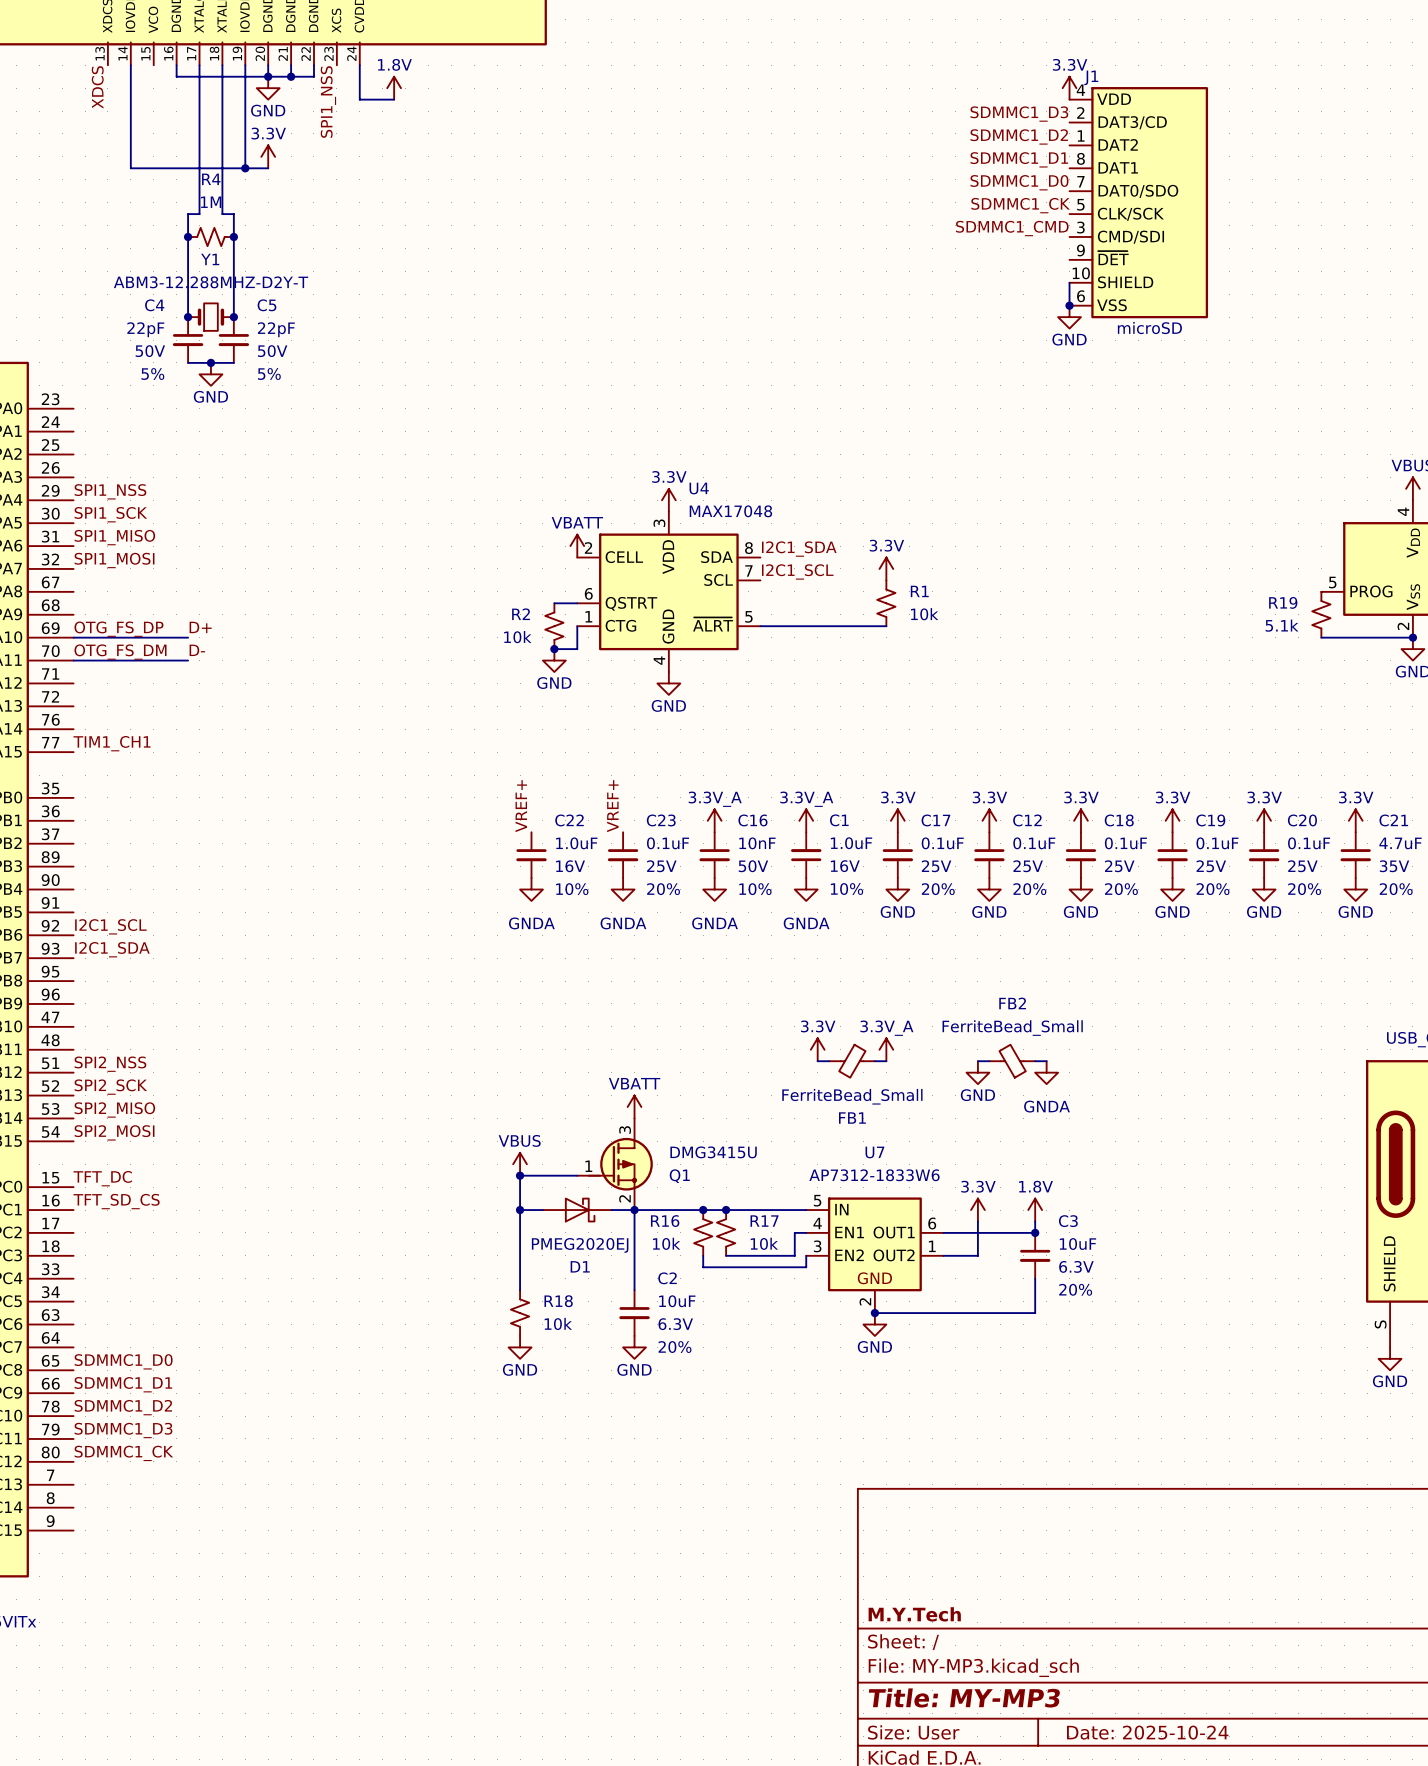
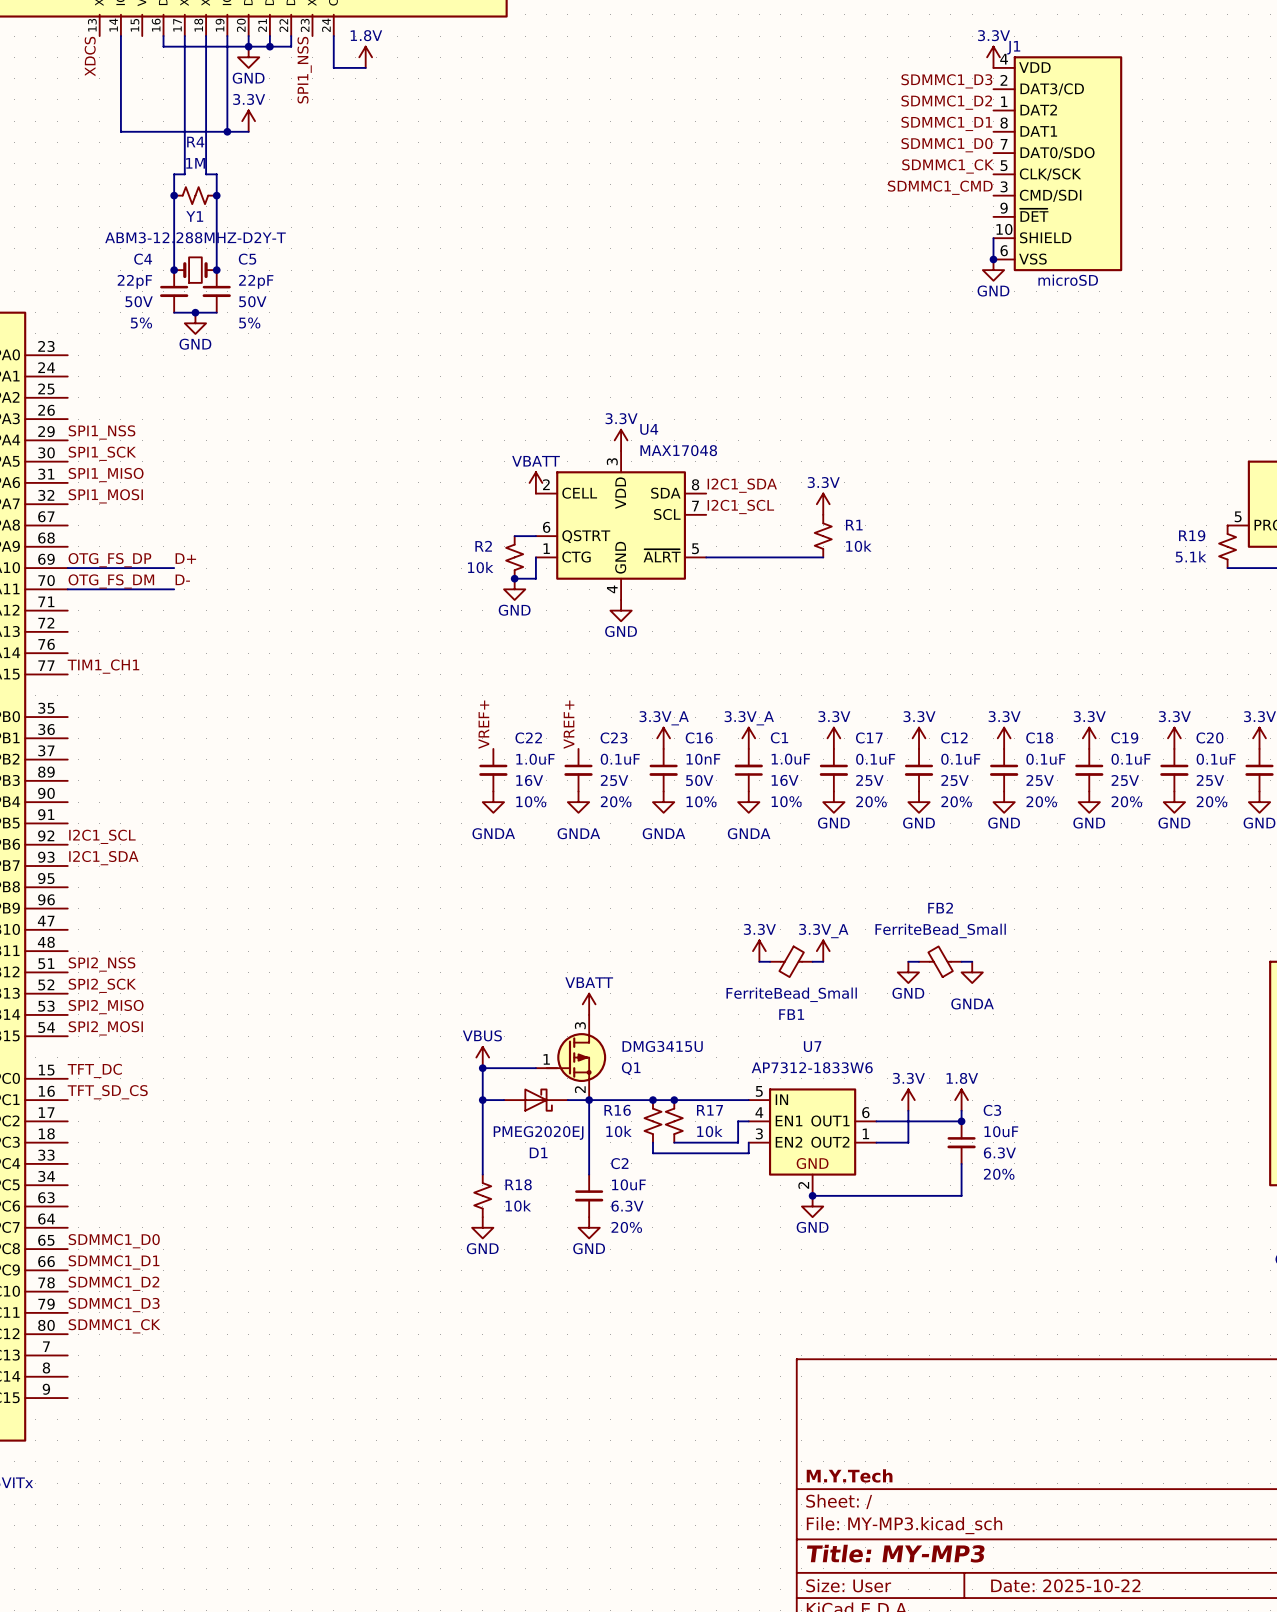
title block: Date: 2025-10-24 (1147, 1732) -> Date: 2025-10-22 (1065, 1585)

